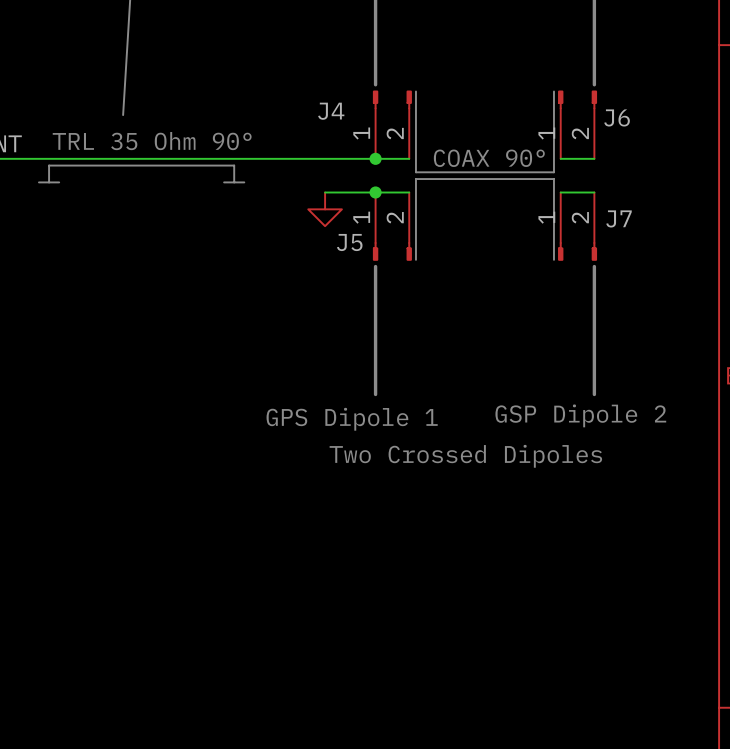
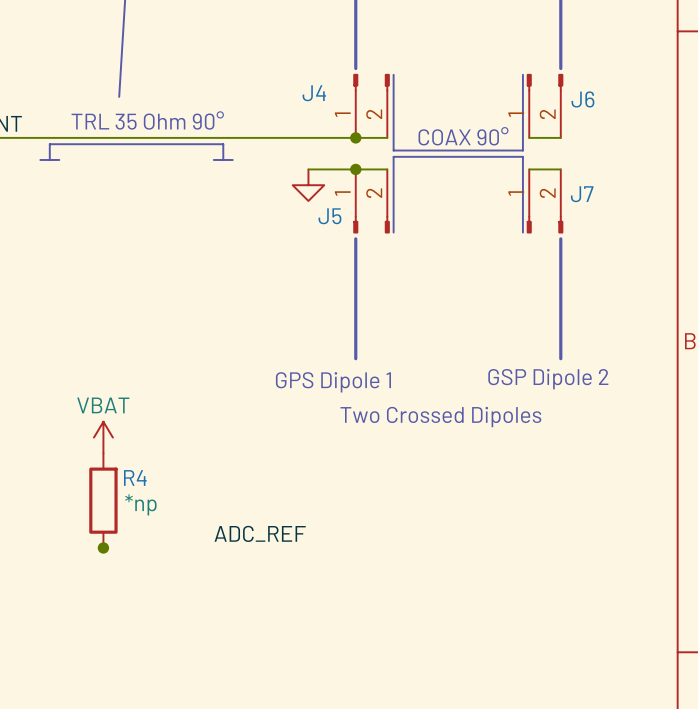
power symbol: none -> VBAT (103, 437)
R4: none -> *np (103, 500)
label: none -> ADC_REF (260, 533)
junction: none -> (103, 547)

